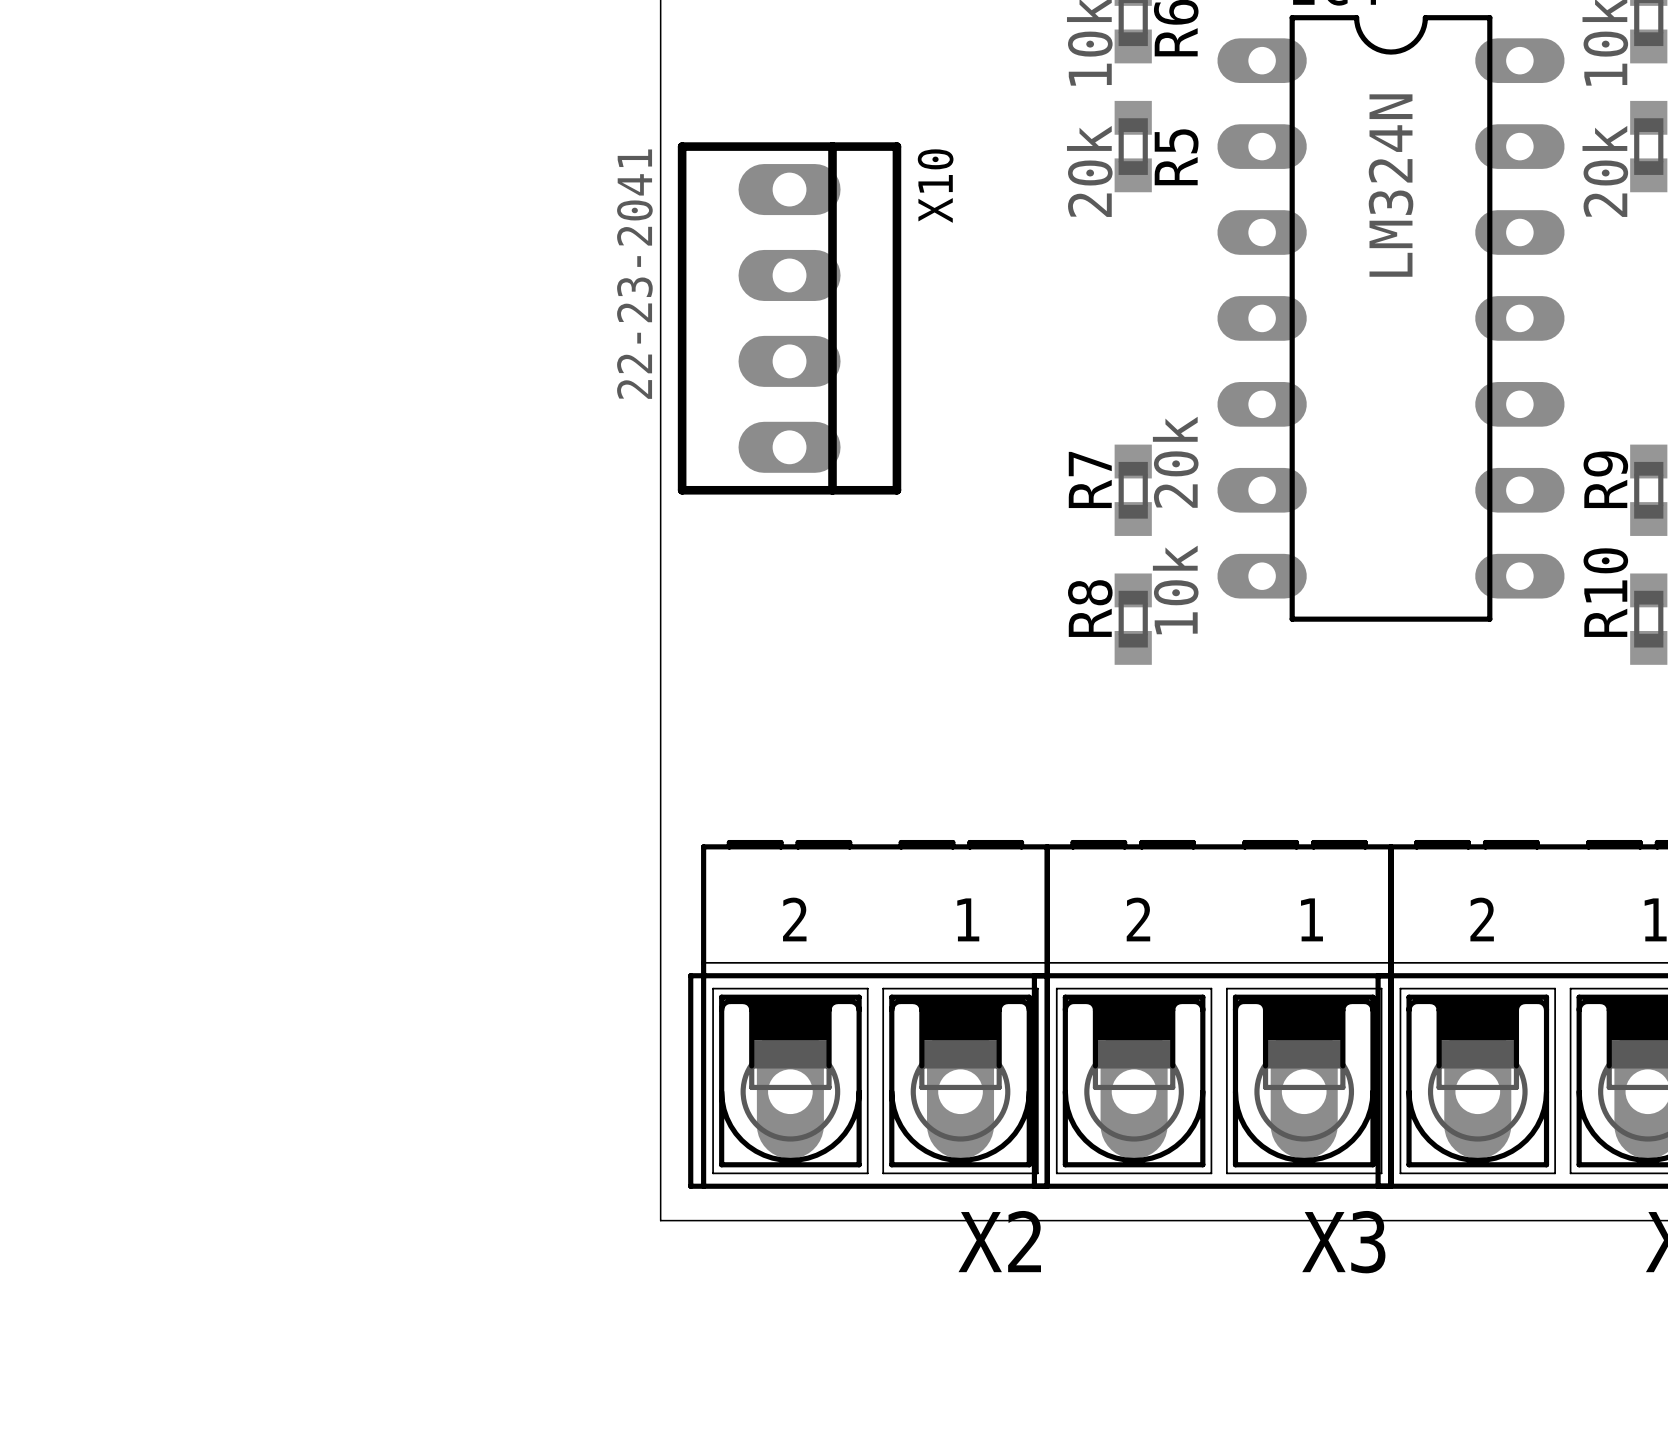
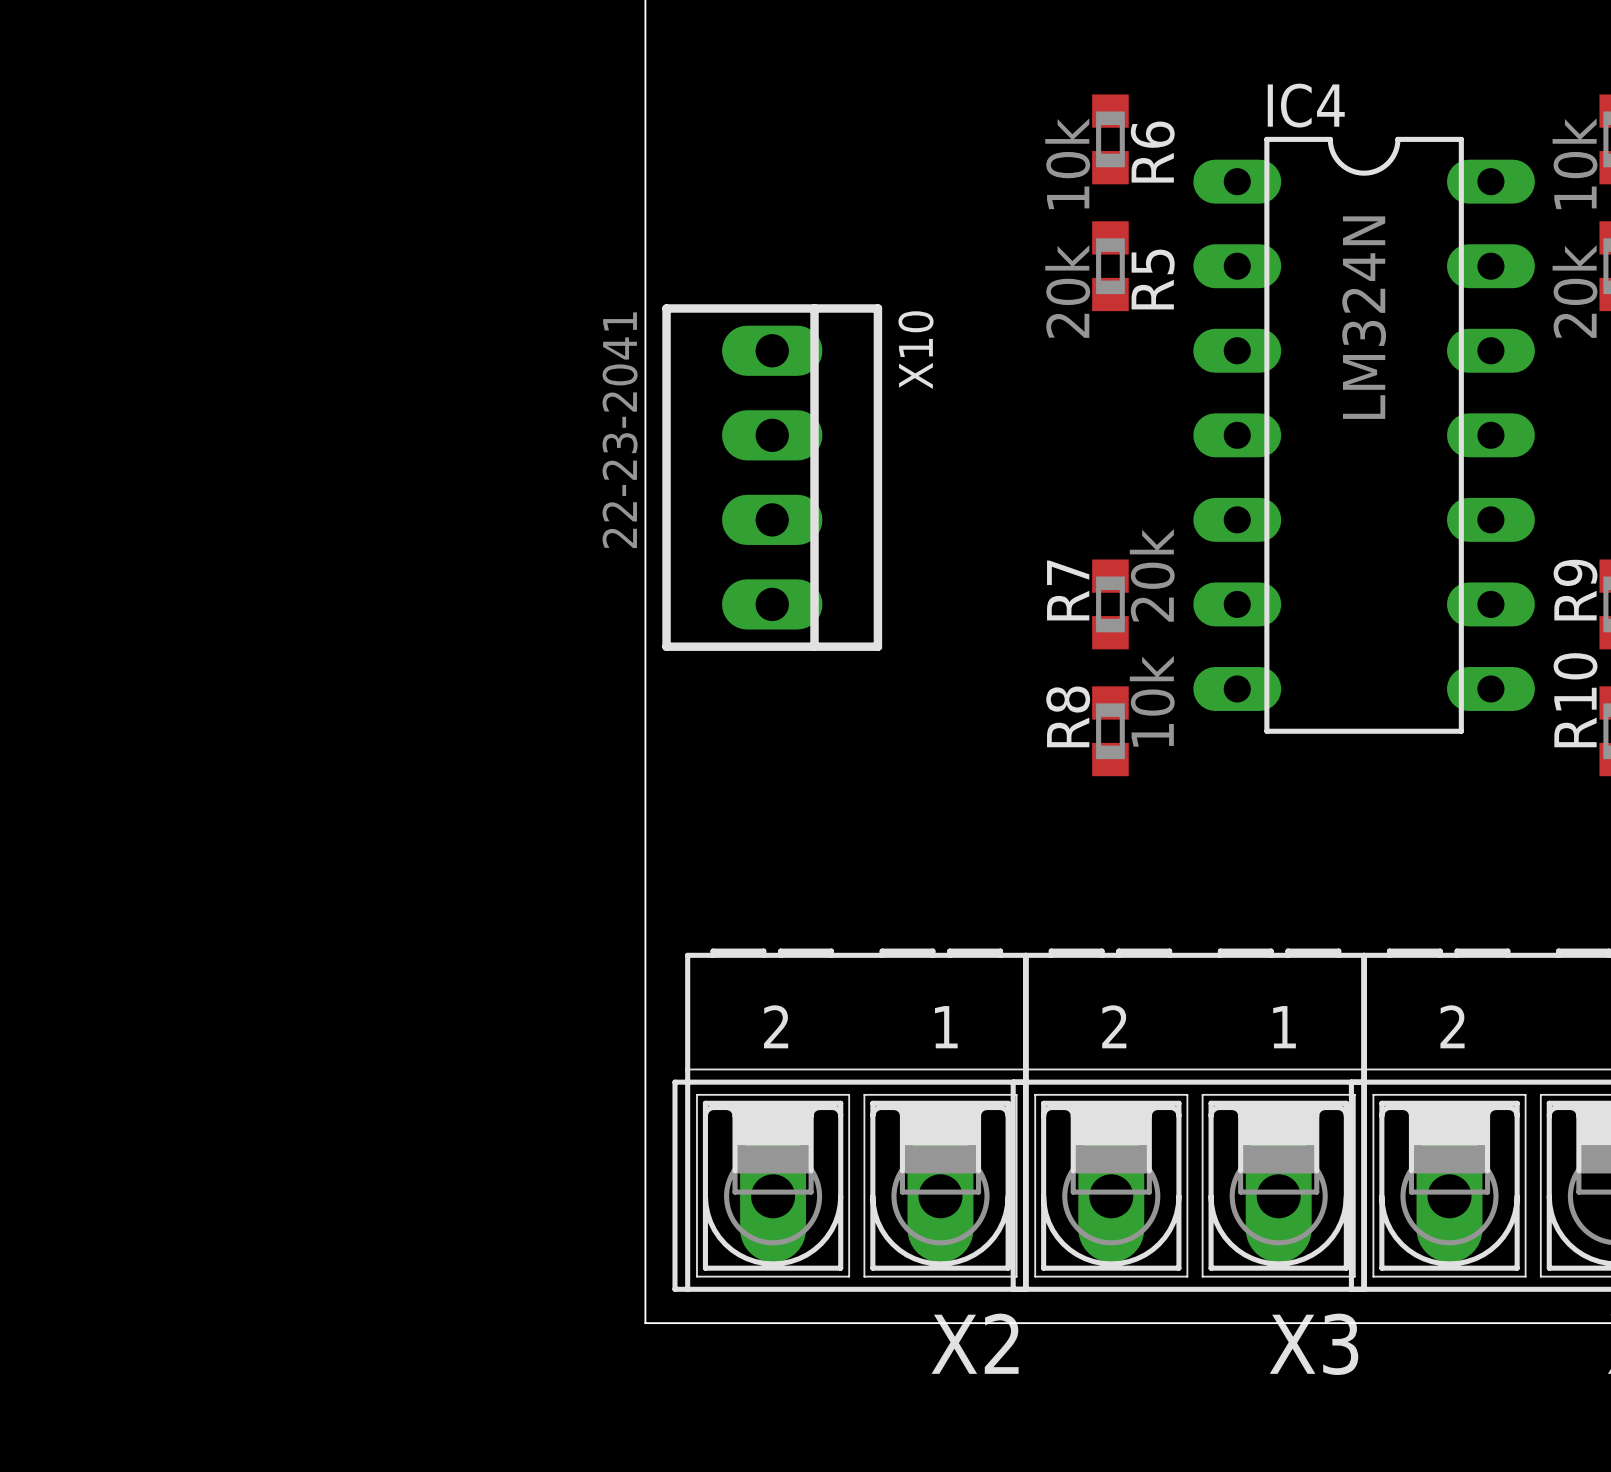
X10 position: (789, 318) -> (772, 477)

